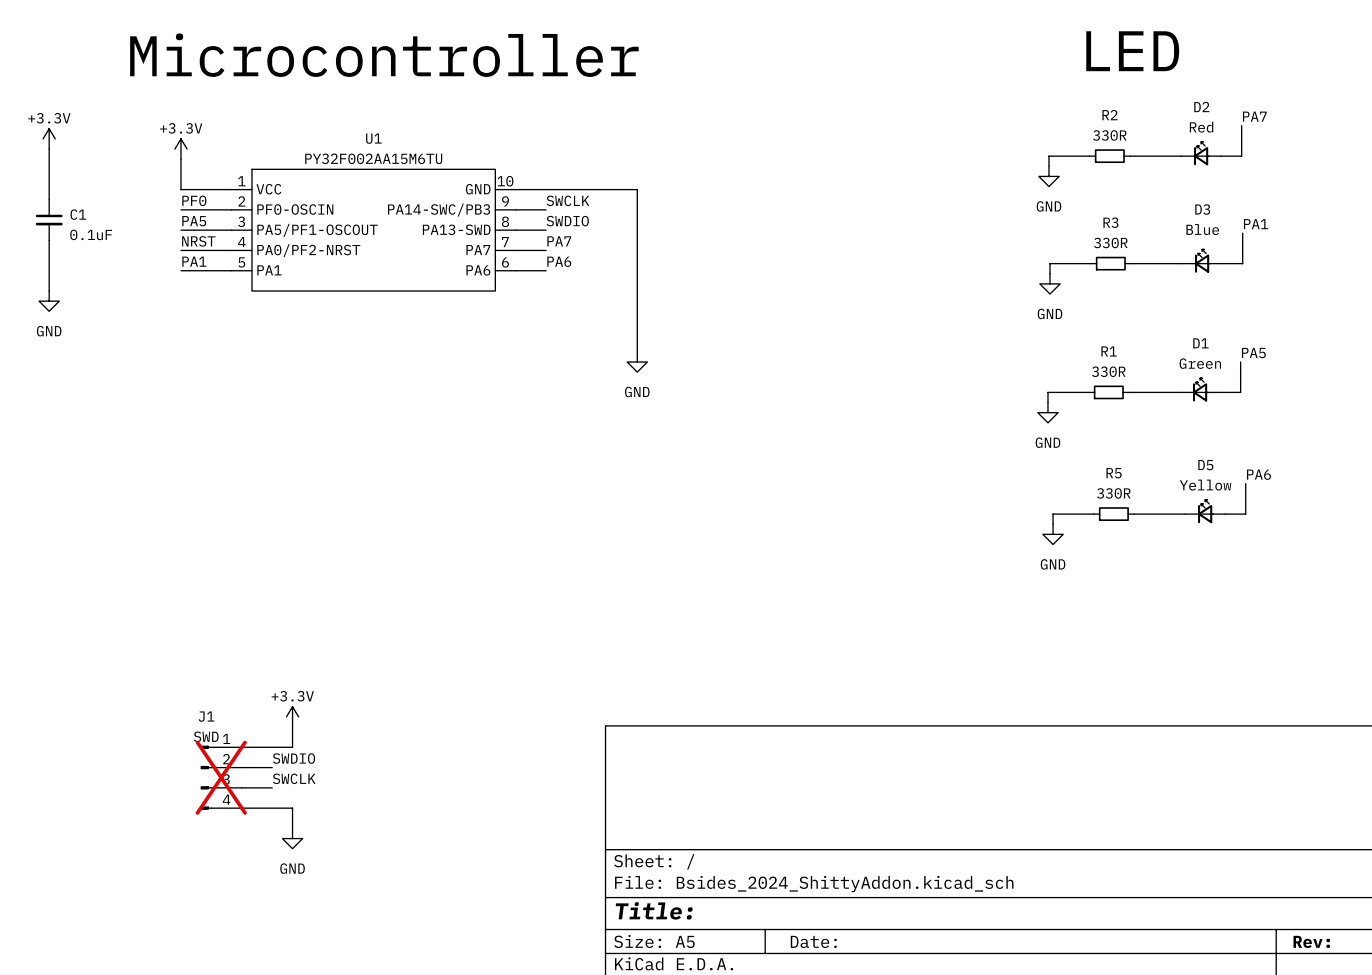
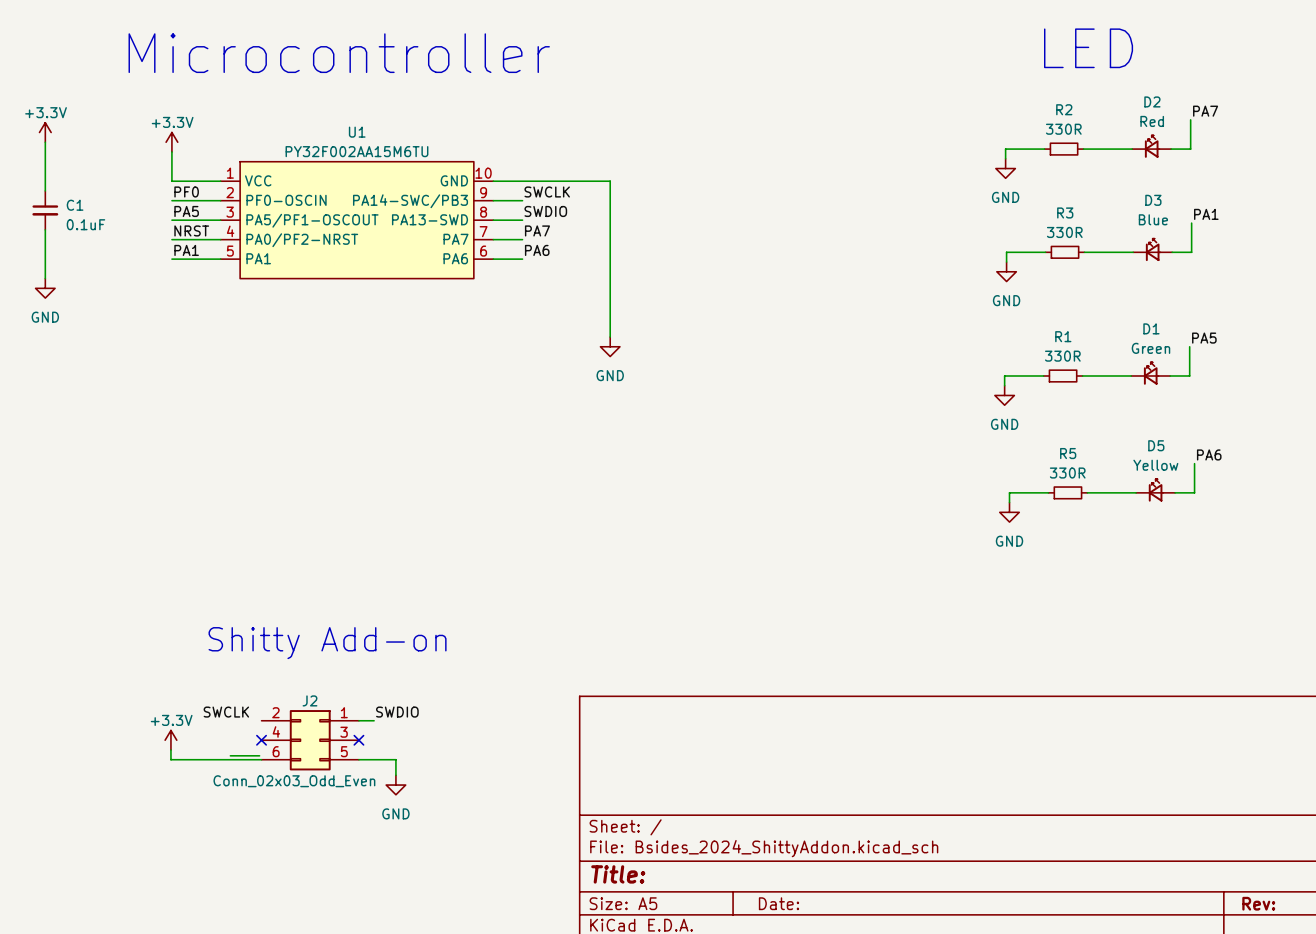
text: none -> Shitty Add-on (327, 643)
power symbol position: +3.3V (292, 716) -> +3.3V (170, 740)
wire: (292, 727) (292, 747) (241, 747) -> none
wire: none -> (358, 720) (374, 720)
label position: SWDIO (293, 758) -> SWDIO (397, 712)
wire: (241, 767) (272, 767) -> none
no-connect mark: none -> (261, 740)
J2: none -> Conn_02x03_Odd_Even (310, 740)
no-connect mark: none -> (358, 740)
J1: SWD (221, 777) -> none
label position: SWCLK (294, 778) -> SWCLK (226, 712)
wire: none -> (170, 749) (170, 759) (261, 759)
wire: none -> (358, 759) (395, 759) (395, 775)
wire: (241, 808) (292, 808) (292, 828) -> none
power symbol position: GND (292, 838) -> GND (395, 785)

